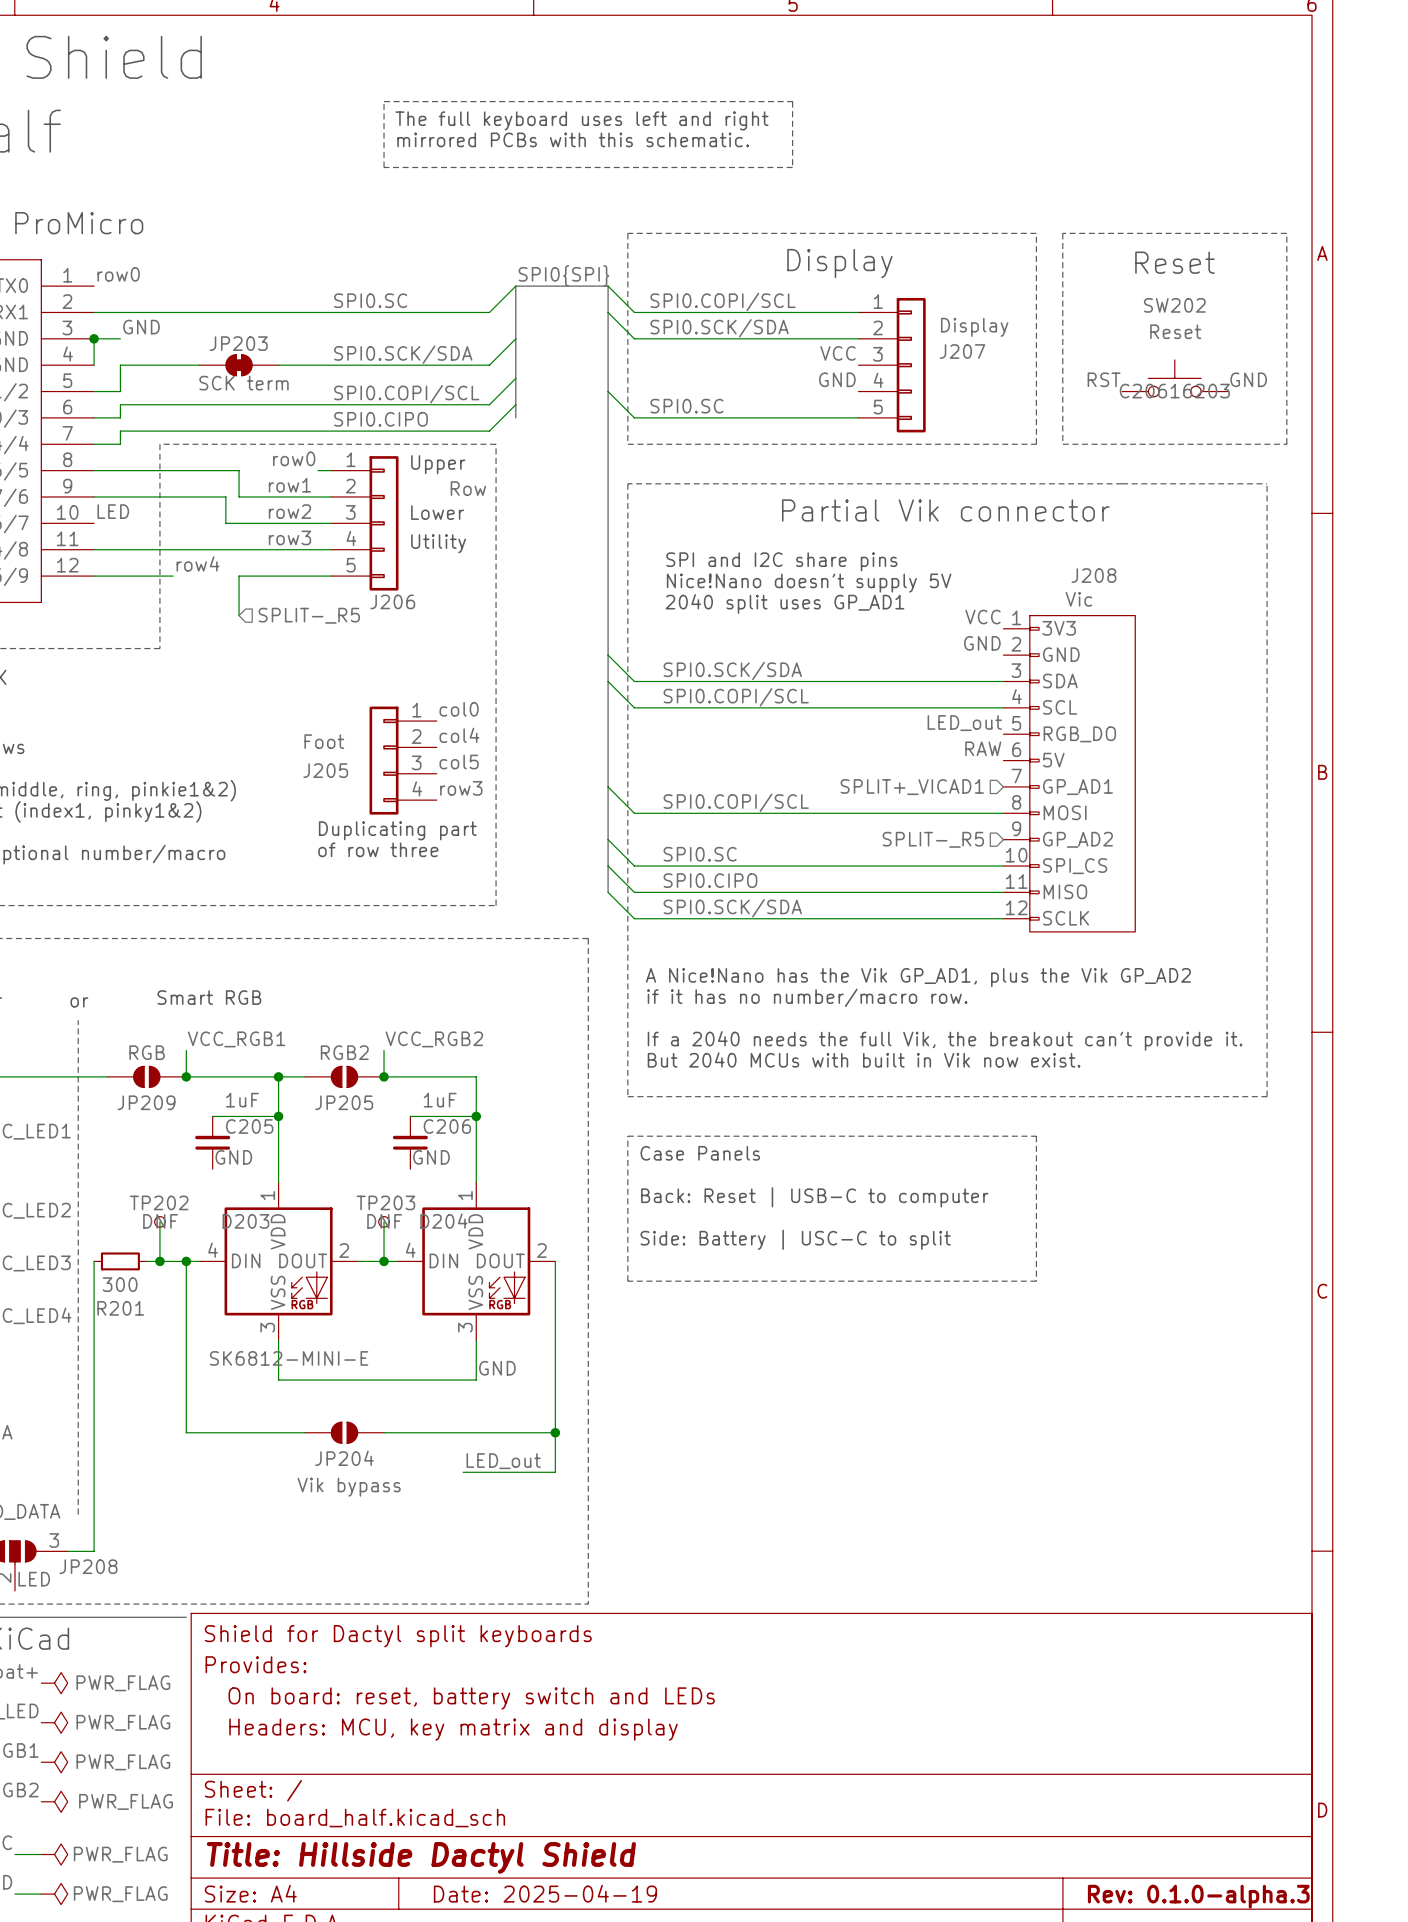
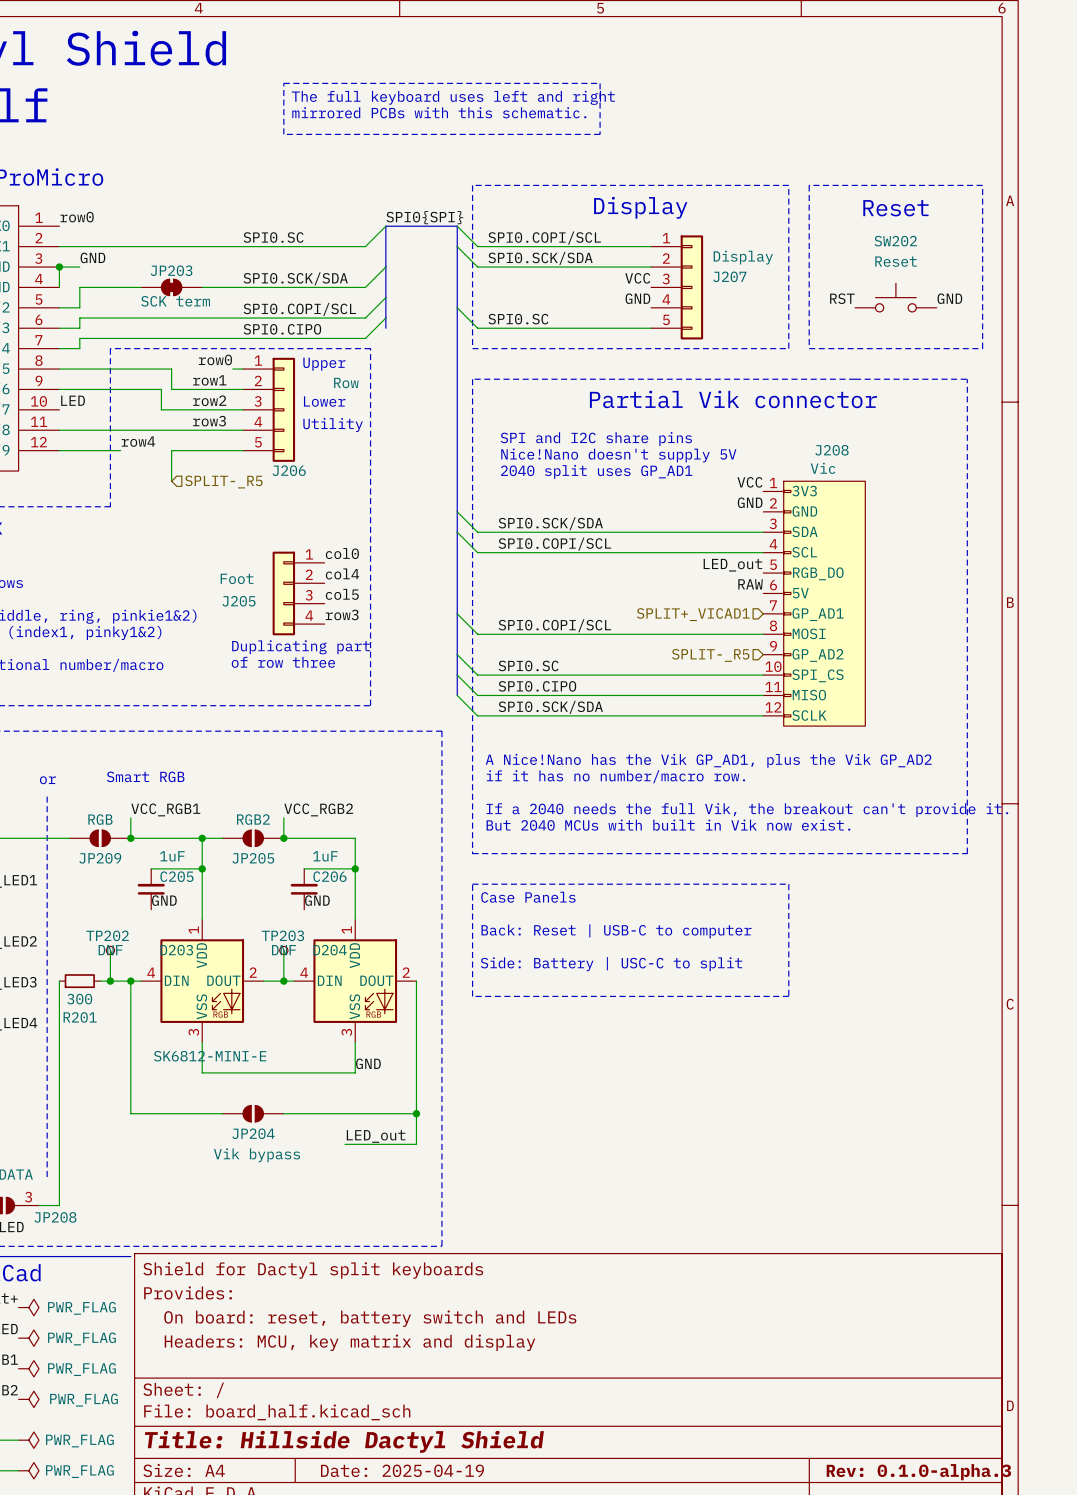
SW202 text: C20616203 (1174, 391) -> none

